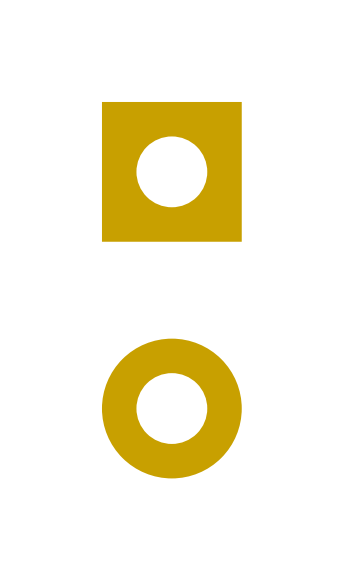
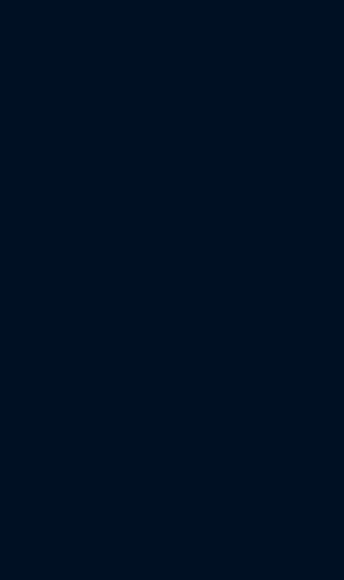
part: (171, 290) -> none

